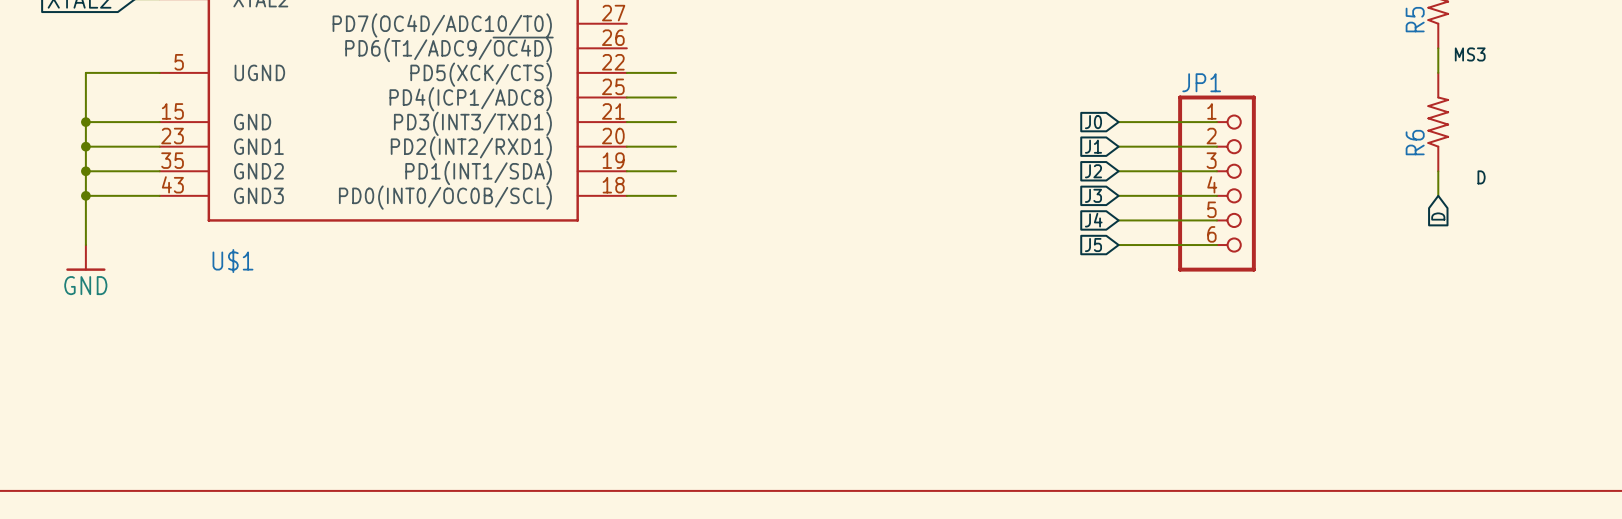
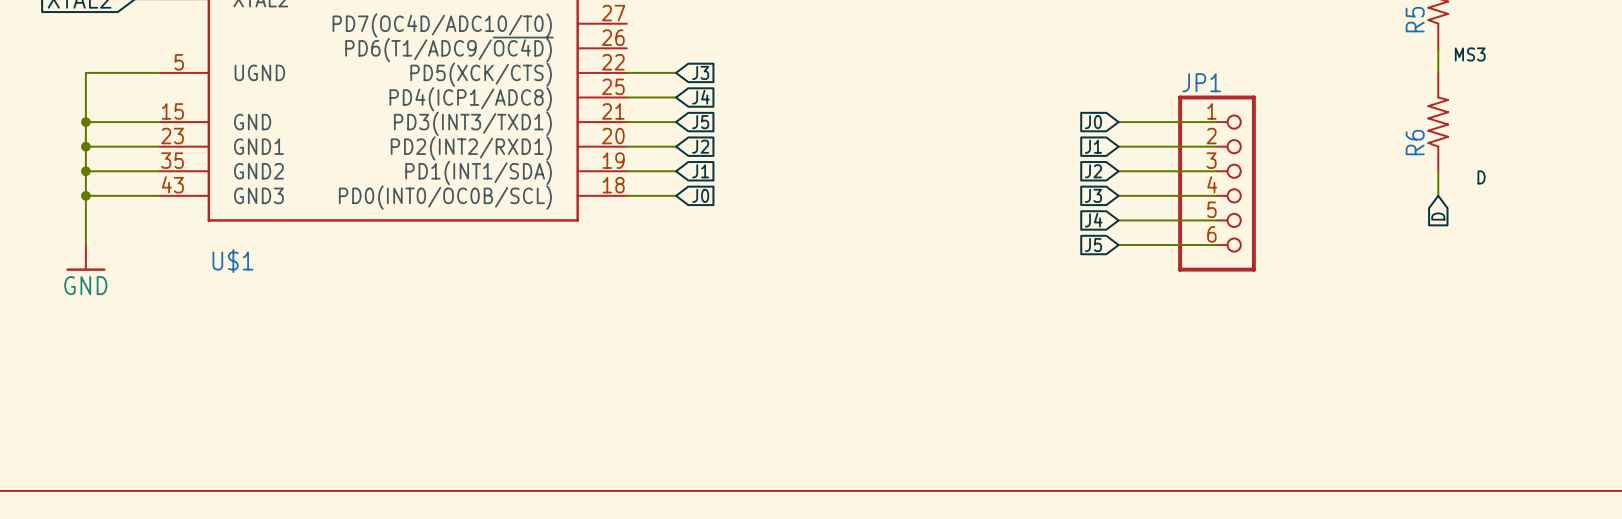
global label: none -> J3 (700, 72)
global label: none -> J4 (700, 97)
global label: none -> J5 (700, 122)
global label: none -> J2 (700, 146)
global label: none -> J1 (700, 171)
global label: none -> J0 (700, 195)

